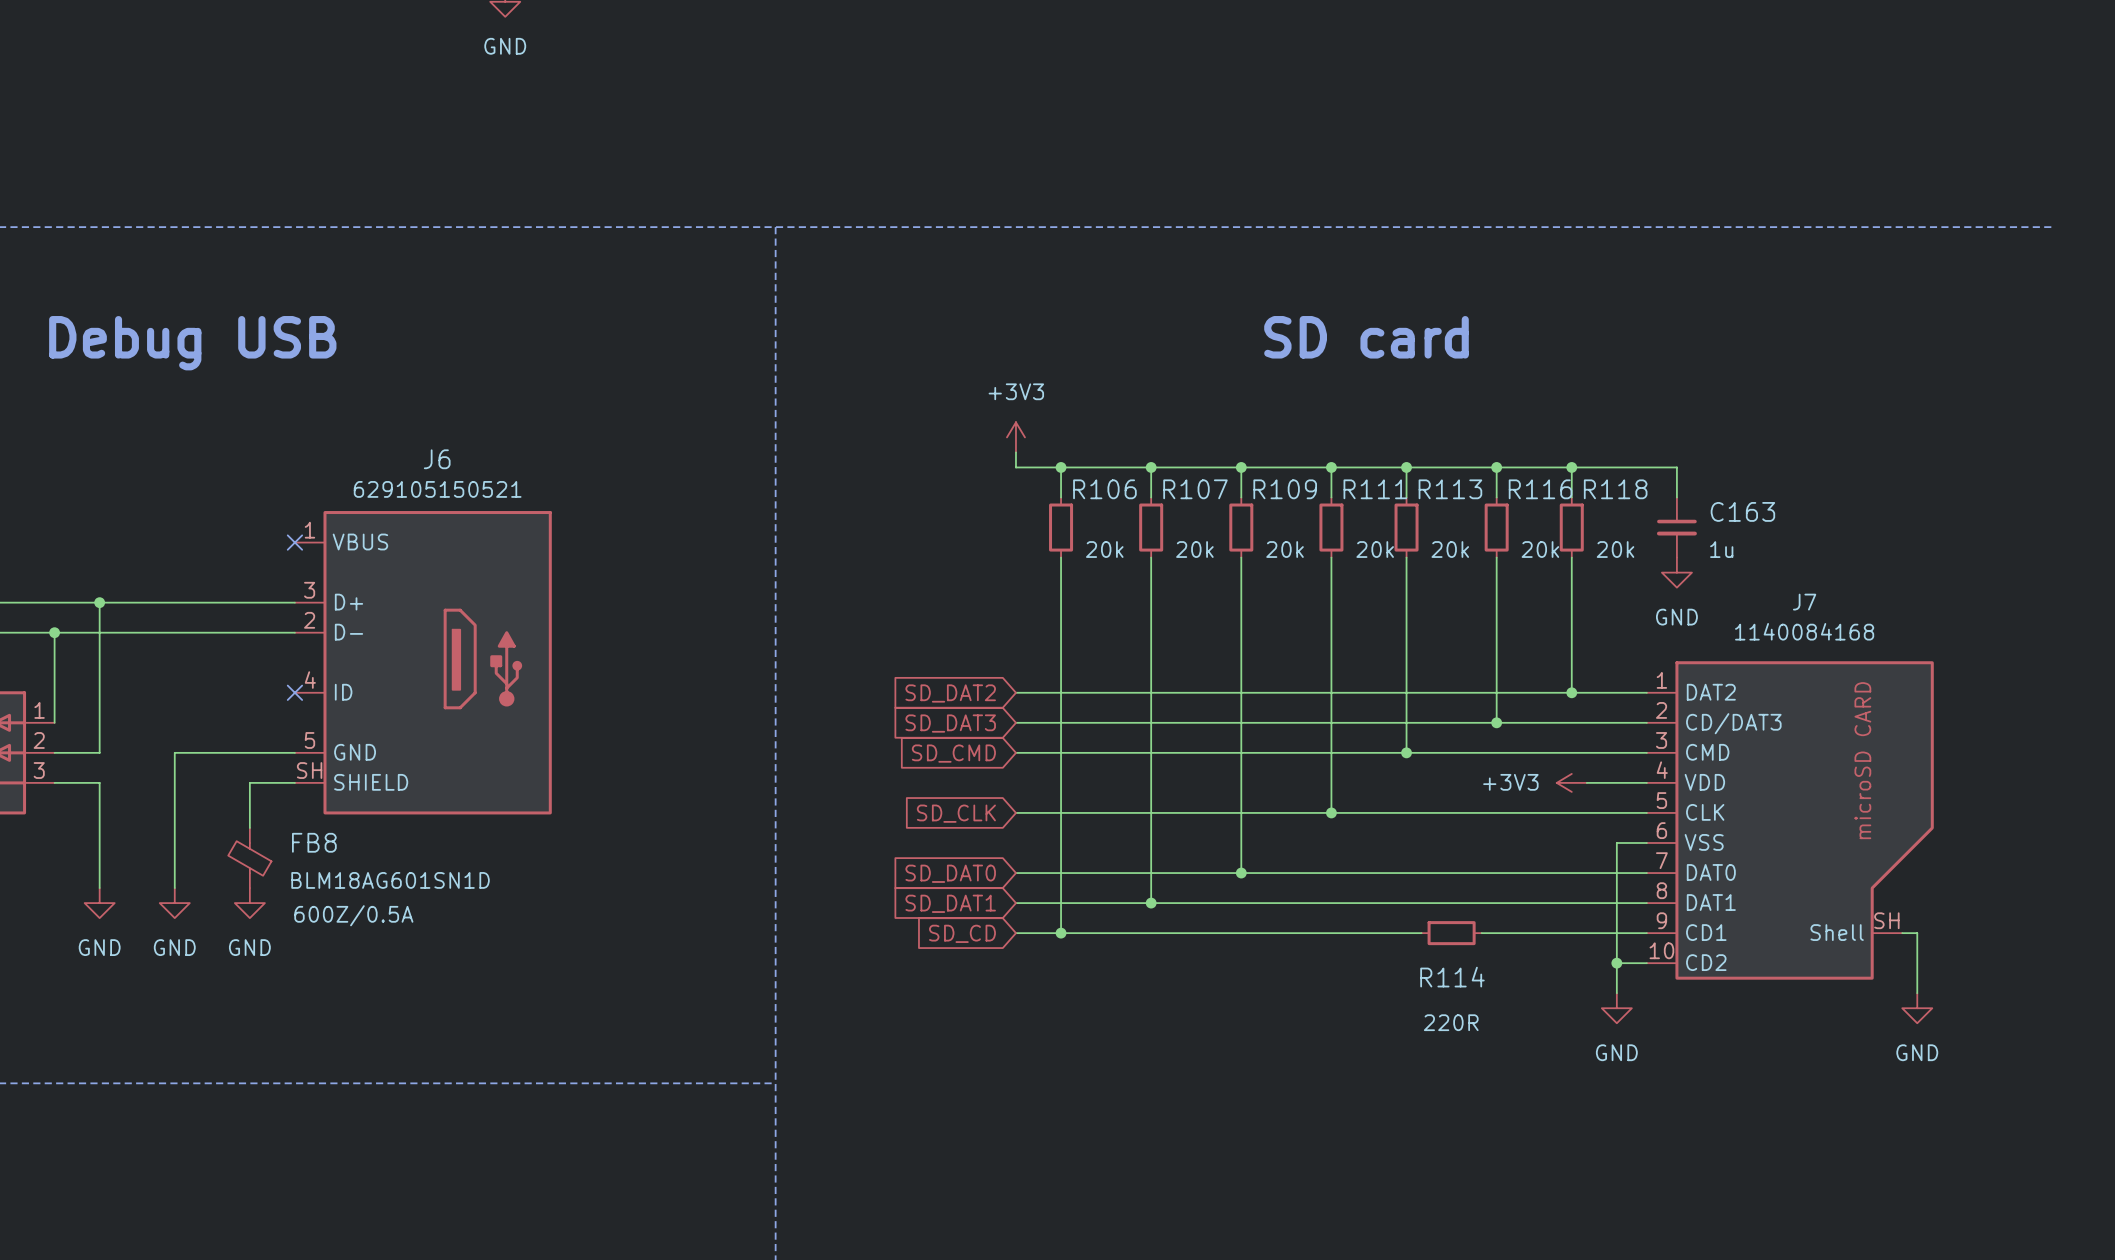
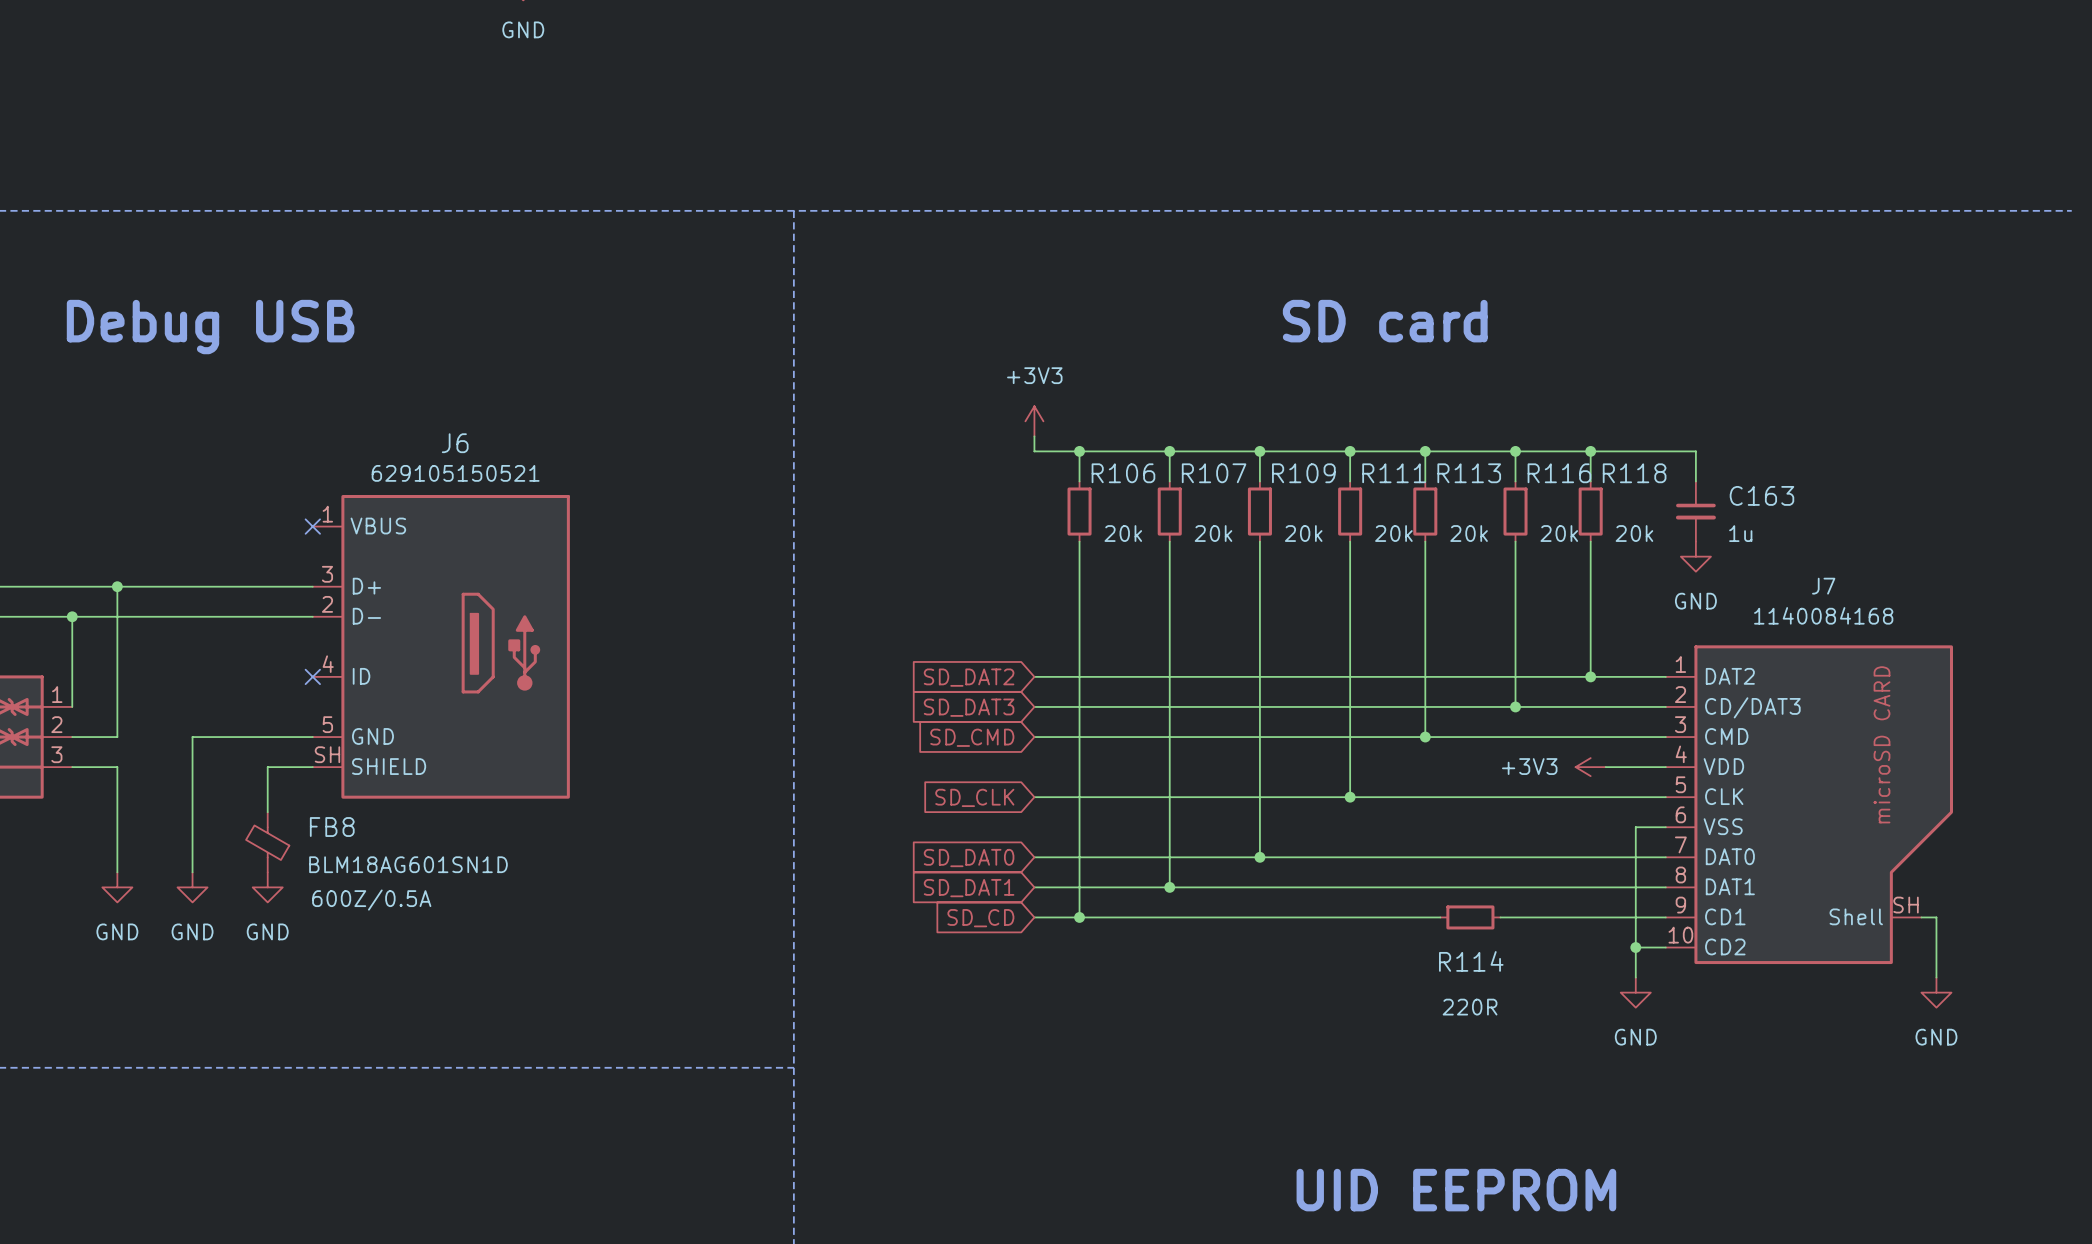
text: none -> UID EEPROM (1456, 1190)

